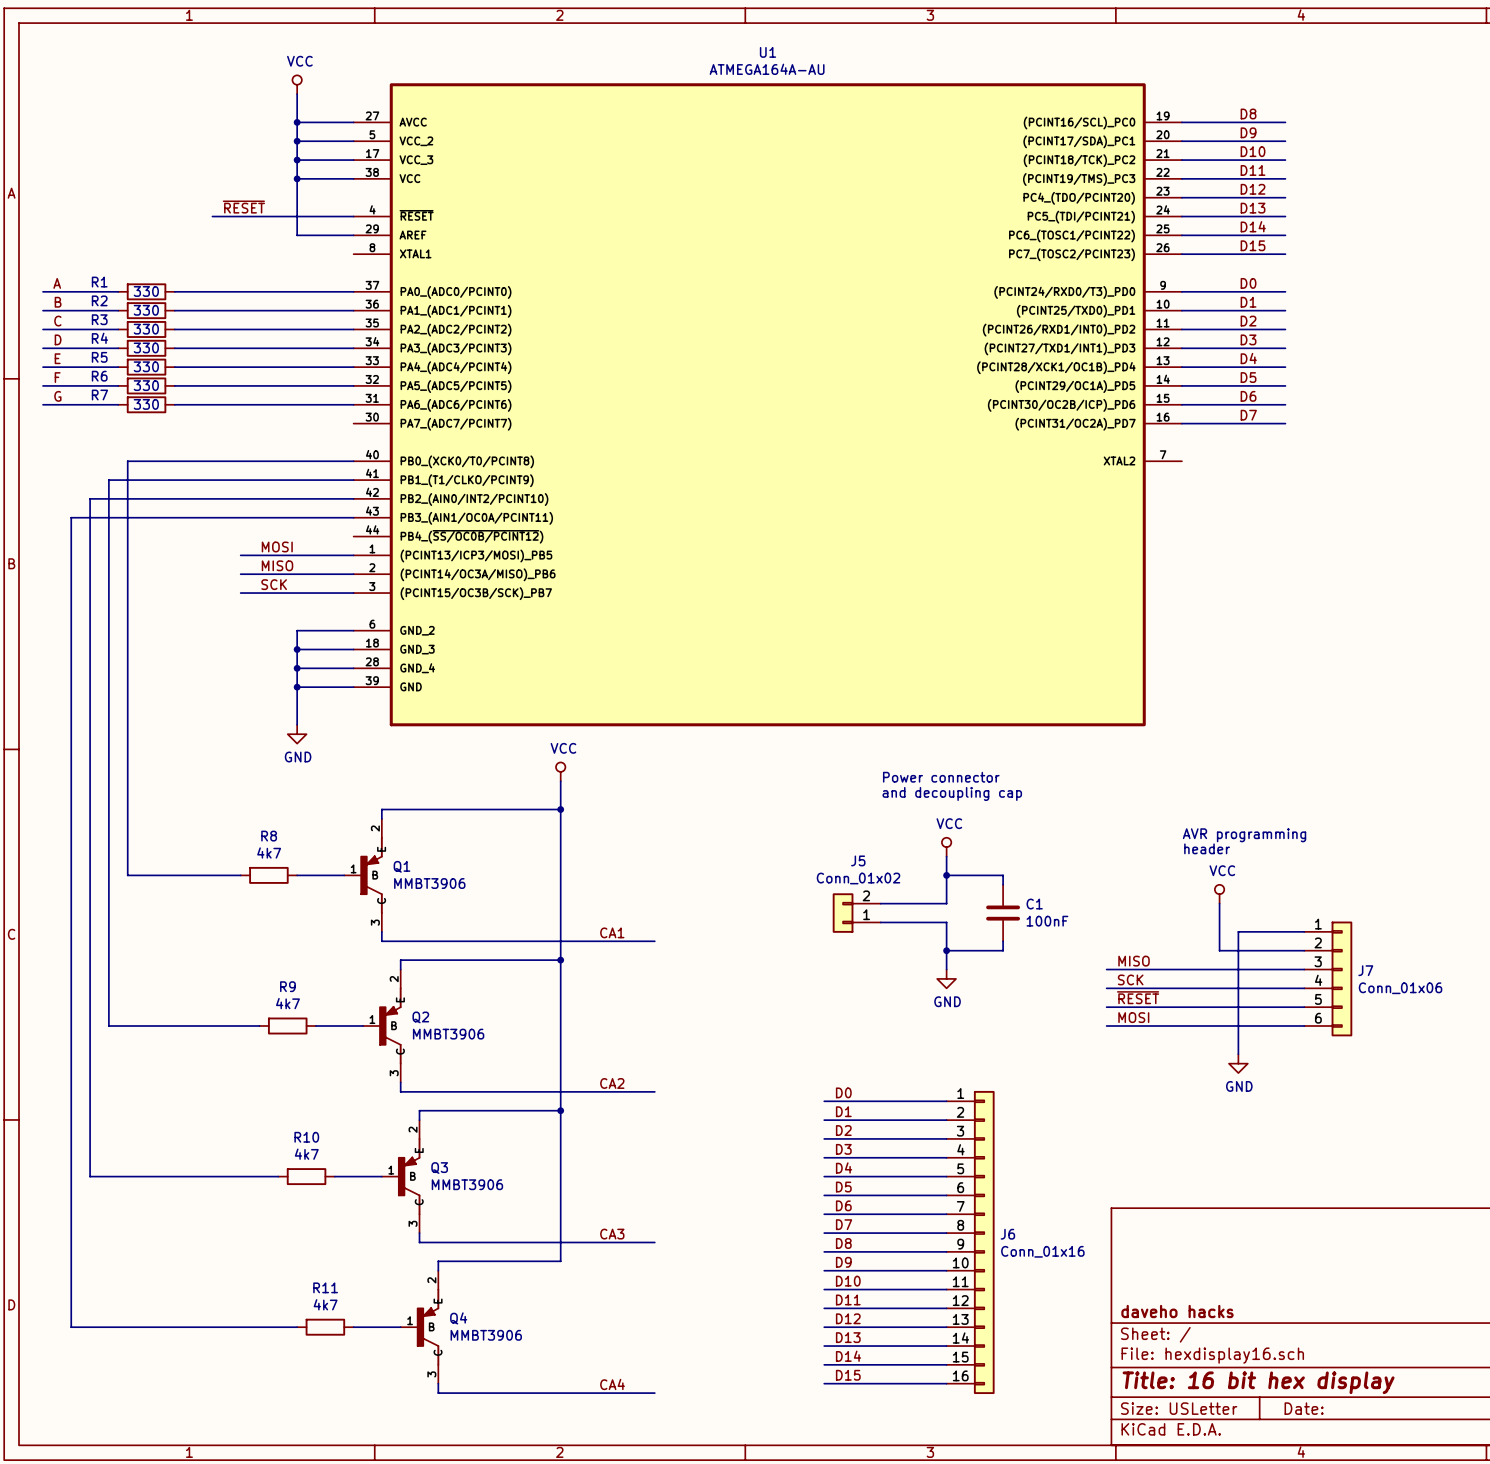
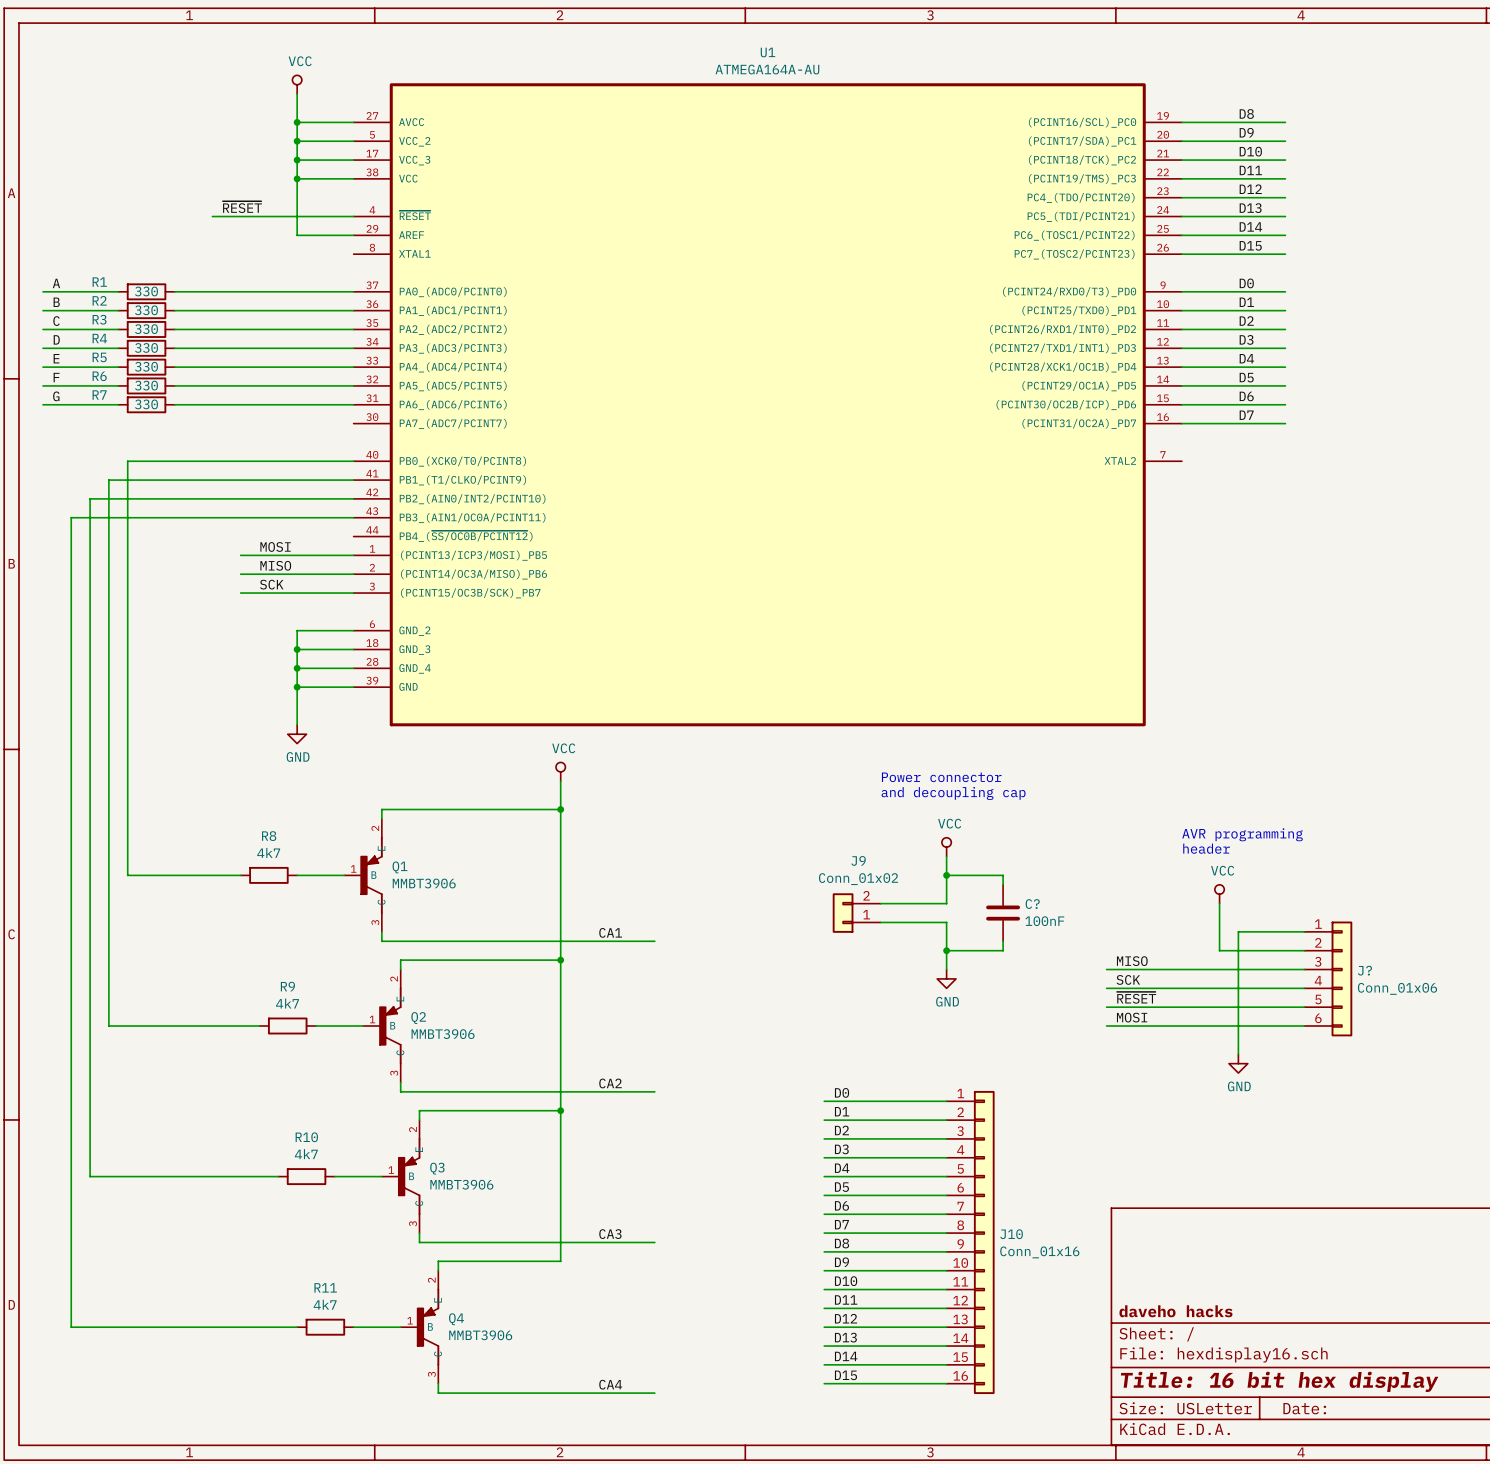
J5 name: J5 (858, 860) -> J9 (858, 860)
C1 name: C1 (1034, 904) -> C? (1032, 904)
J7 name: J7 (1365, 970) -> J? (1364, 970)
J6 name: J6 (1007, 1234) -> J10 (1011, 1234)

